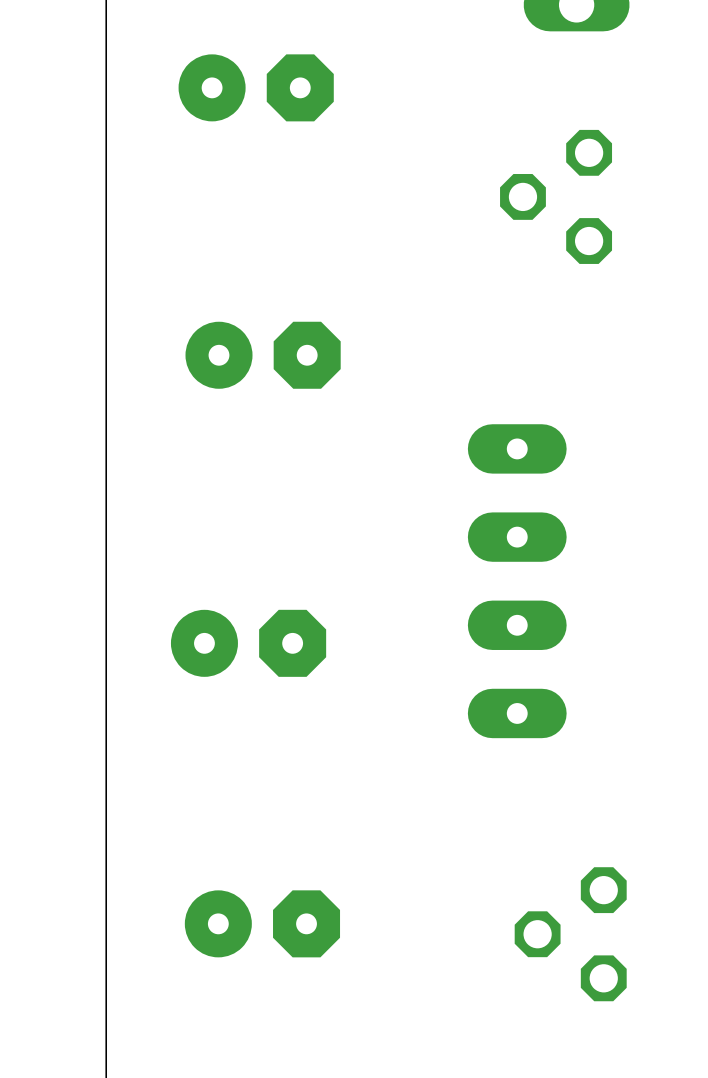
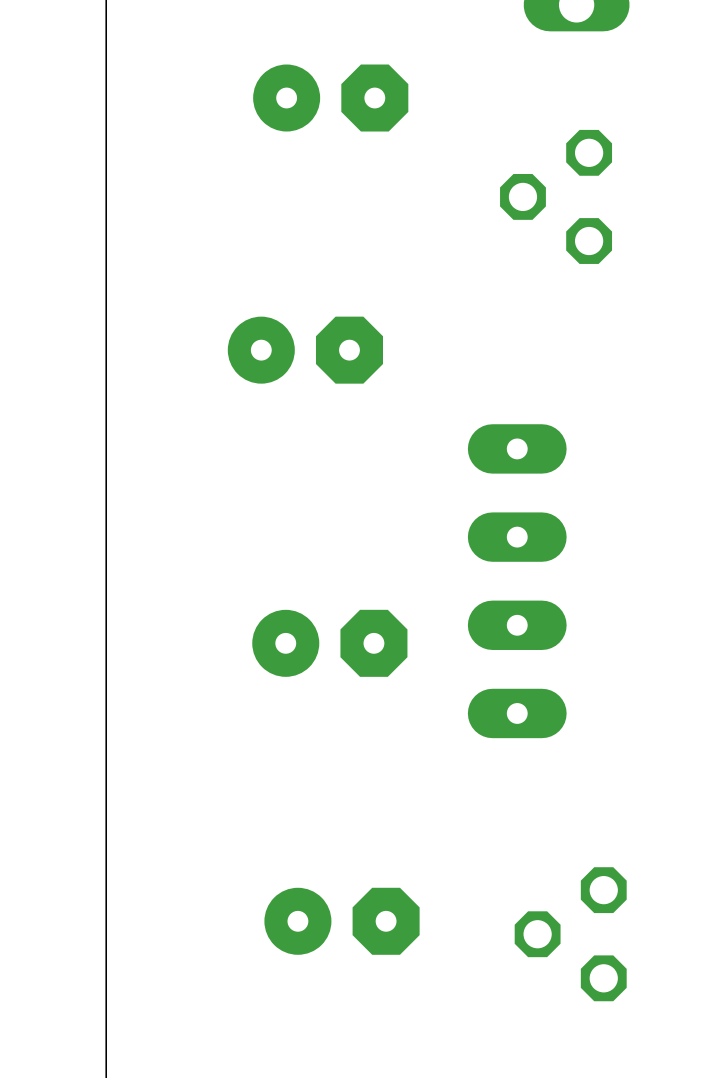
part position: (256, 87) -> (330, 98)
part position: (263, 355) -> (305, 350)
part position: (248, 643) -> (329, 643)
part position: (262, 923) -> (342, 921)

